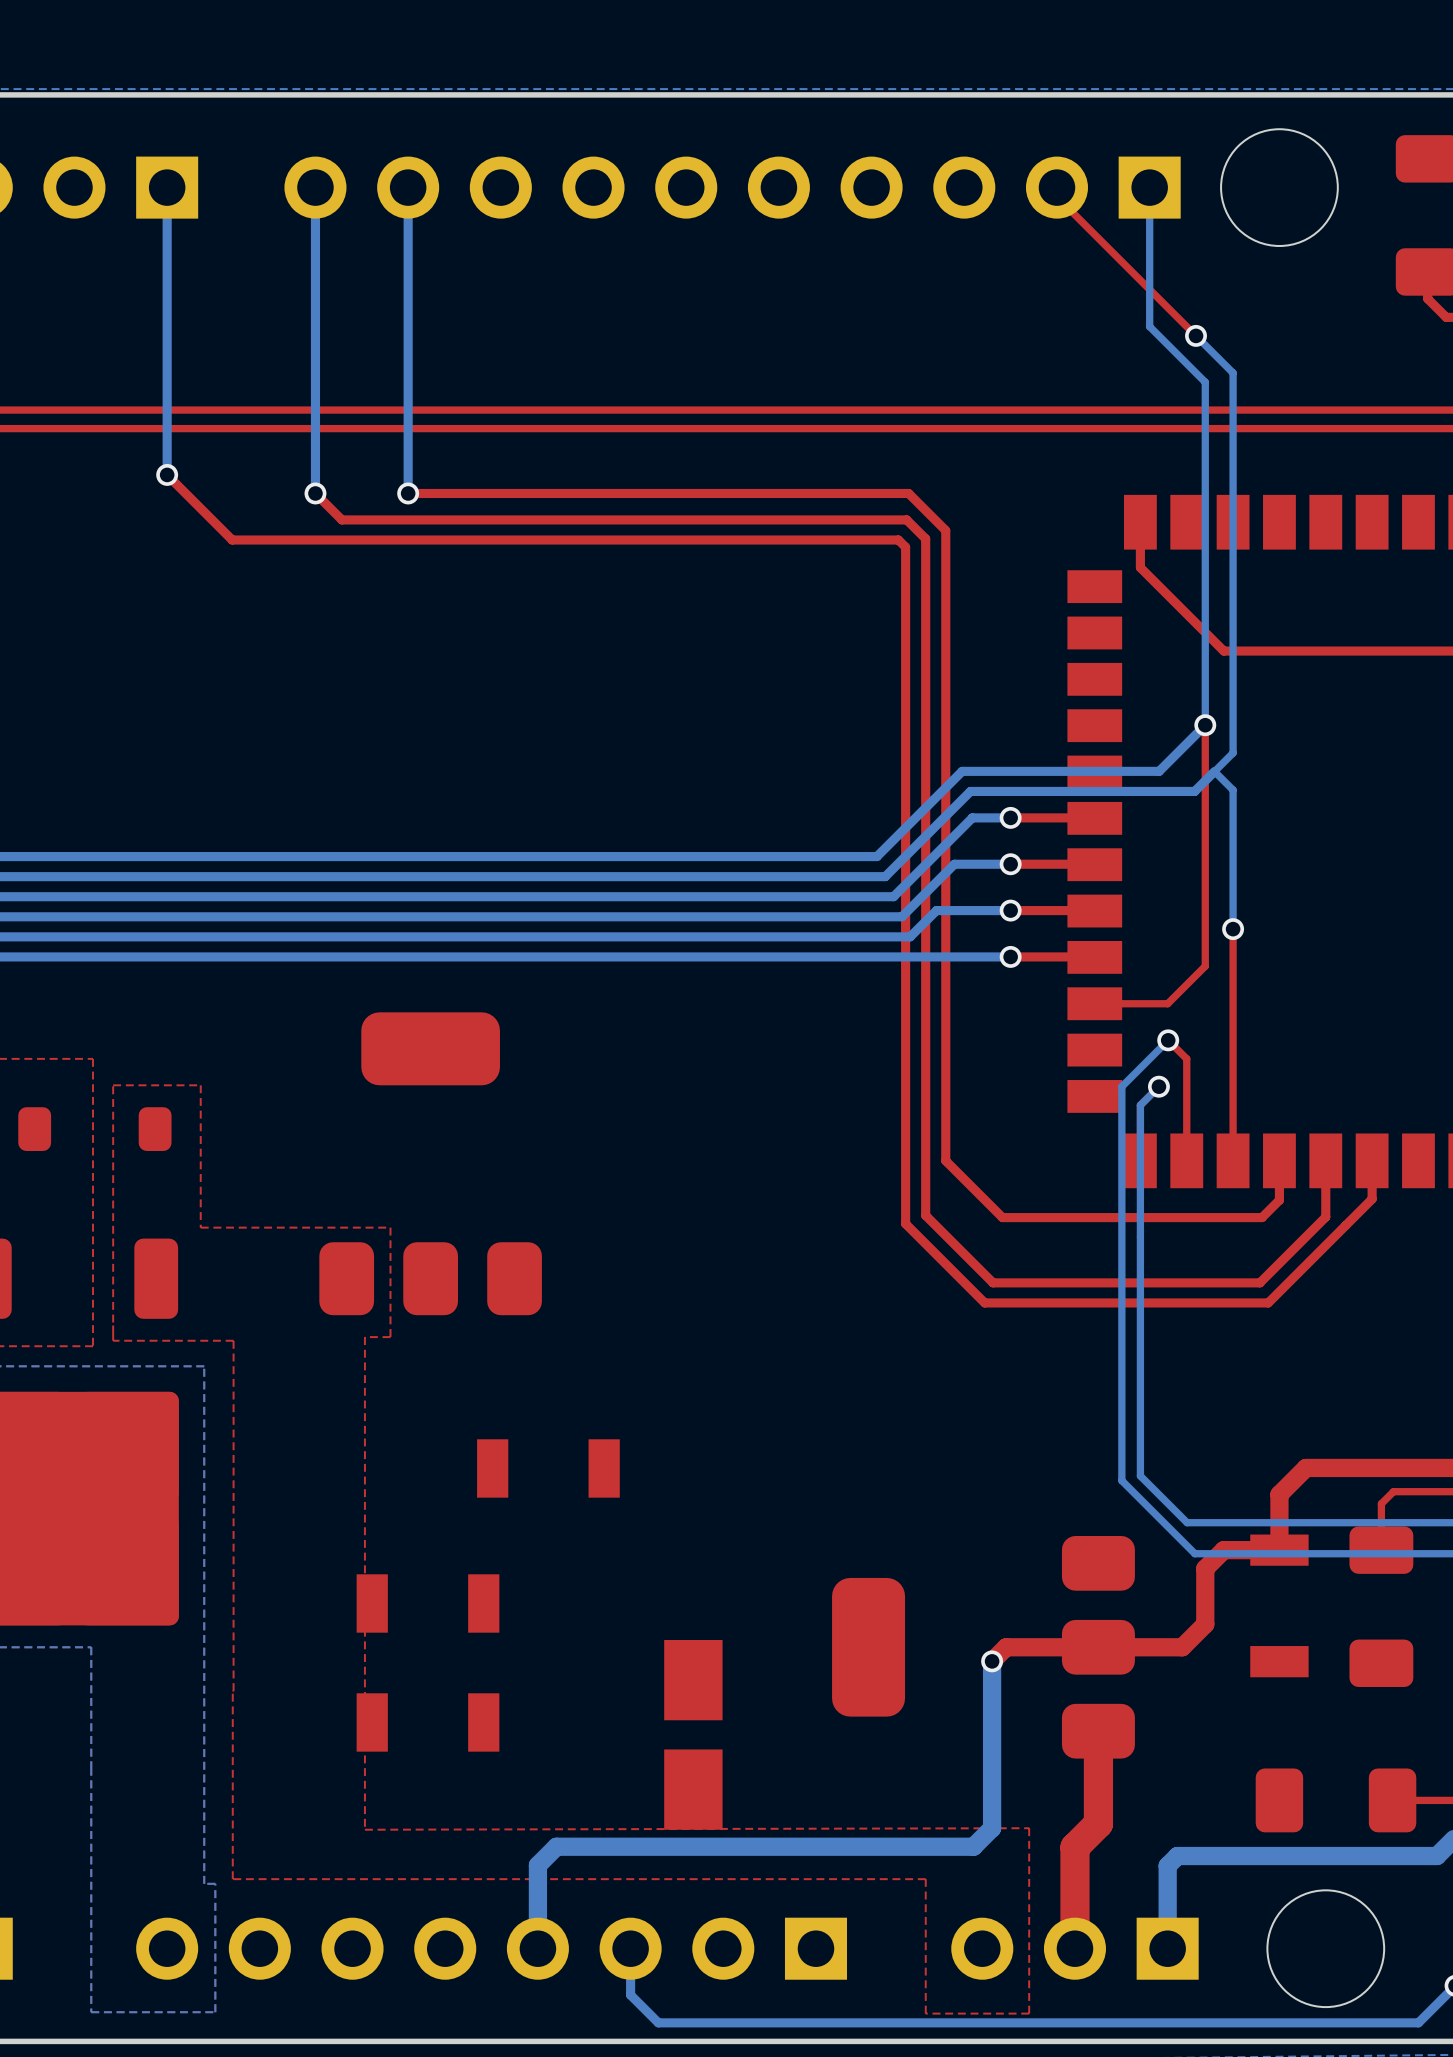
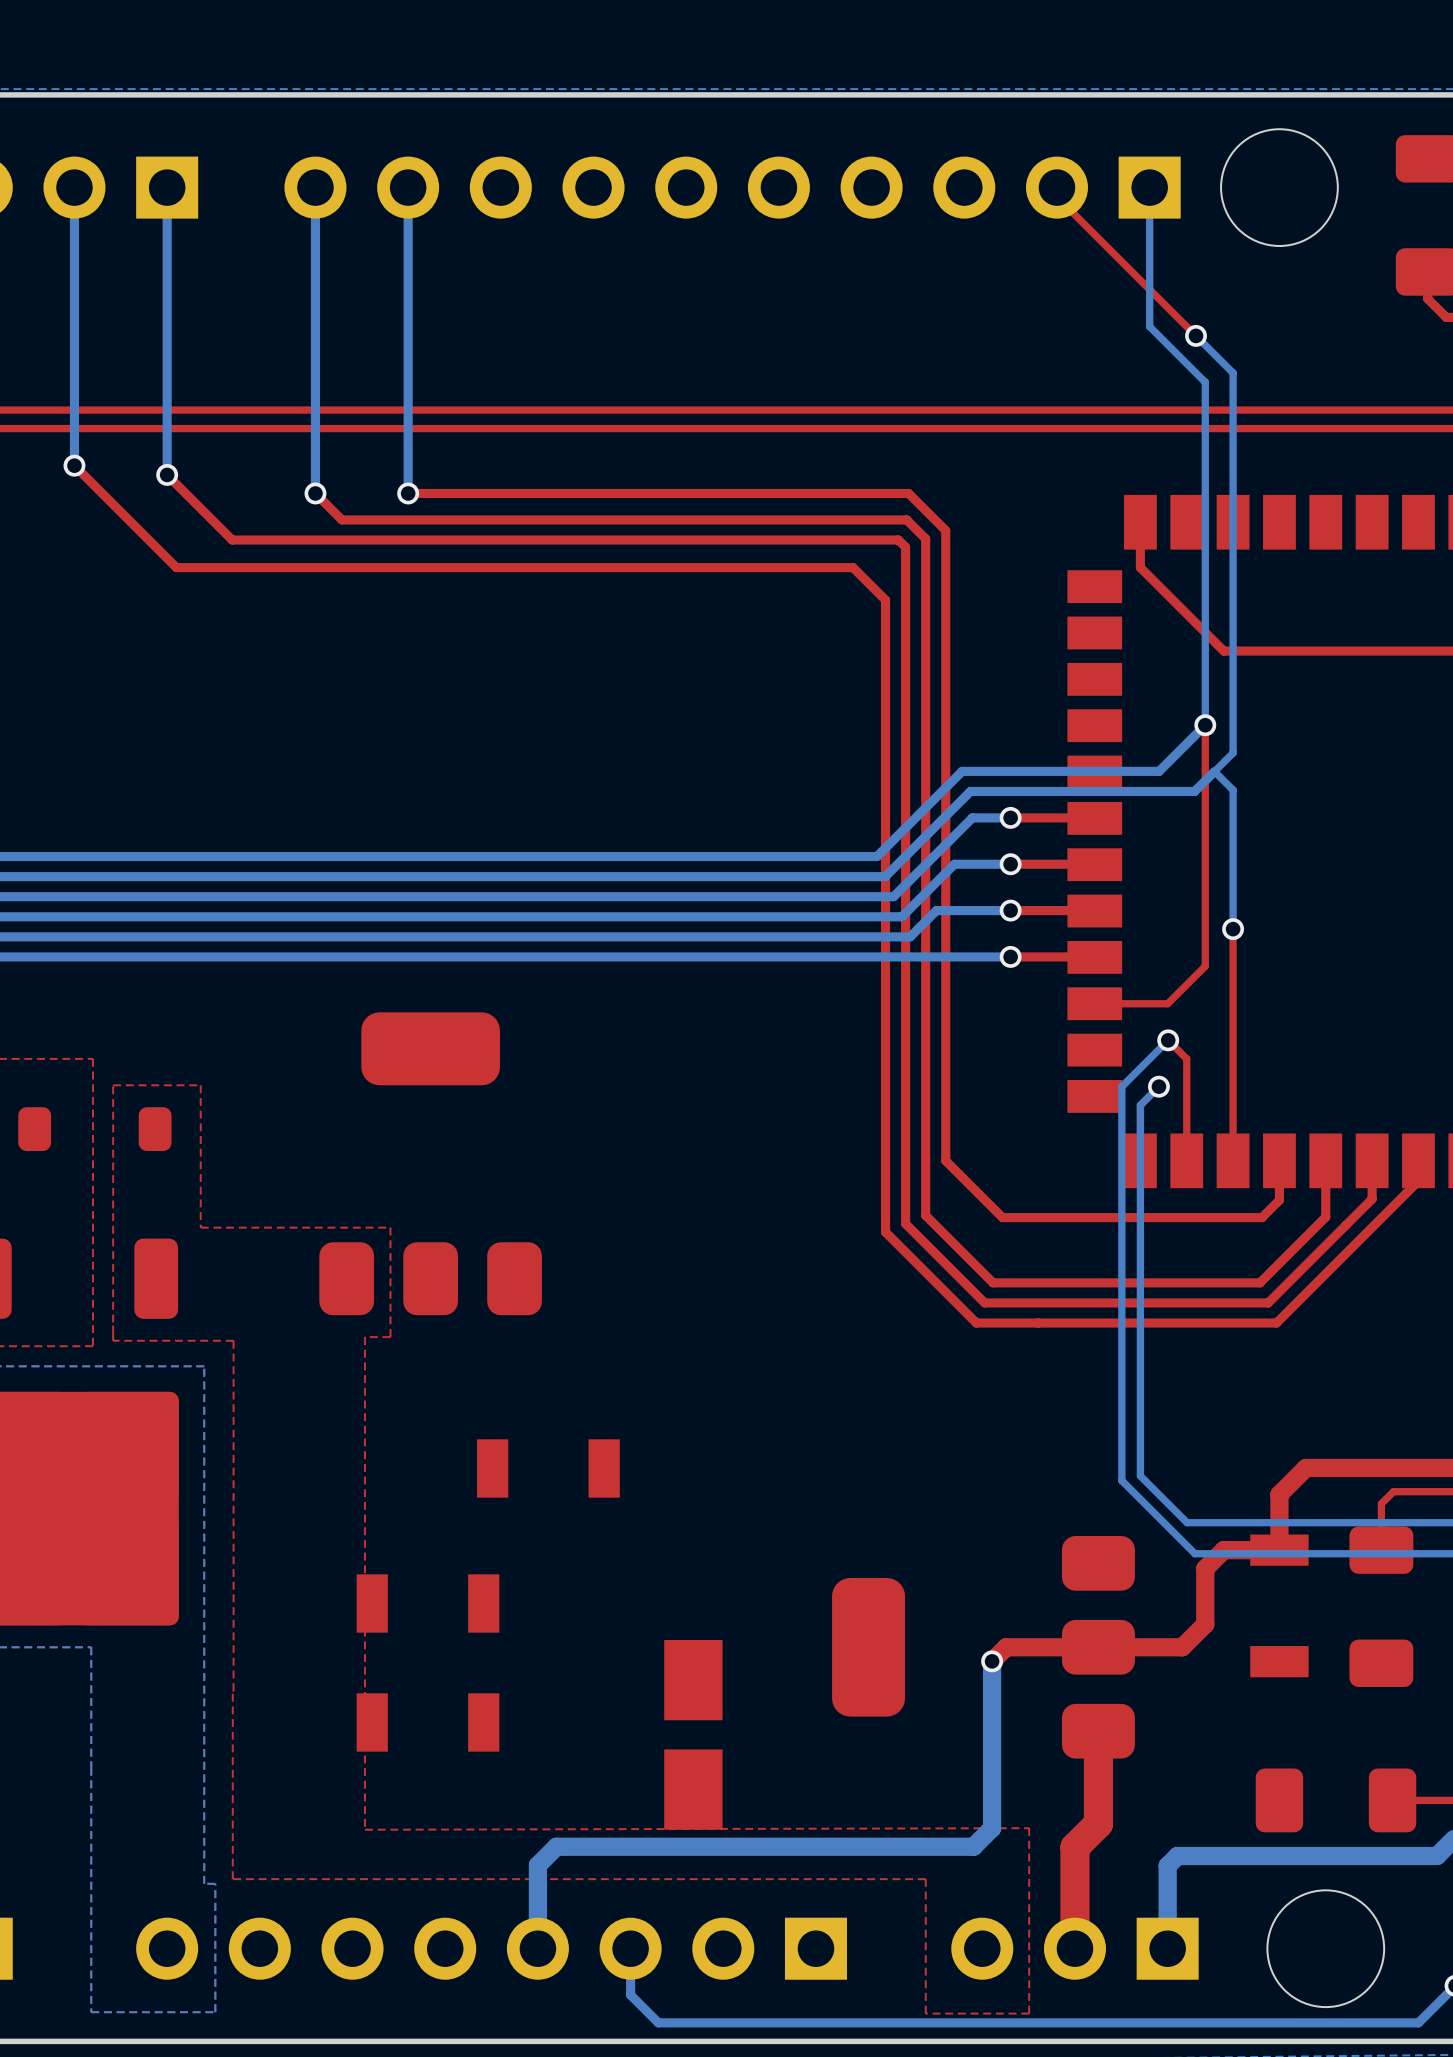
bottom track: none -> (74, 187) (74, 465)
top track: none -> (74, 465) (176, 567) (853, 567) (885, 600) (885, 1232) (976, 1323) (1276, 1323) (1418, 1181) (1418, 1160)
via: none -> (74, 465)

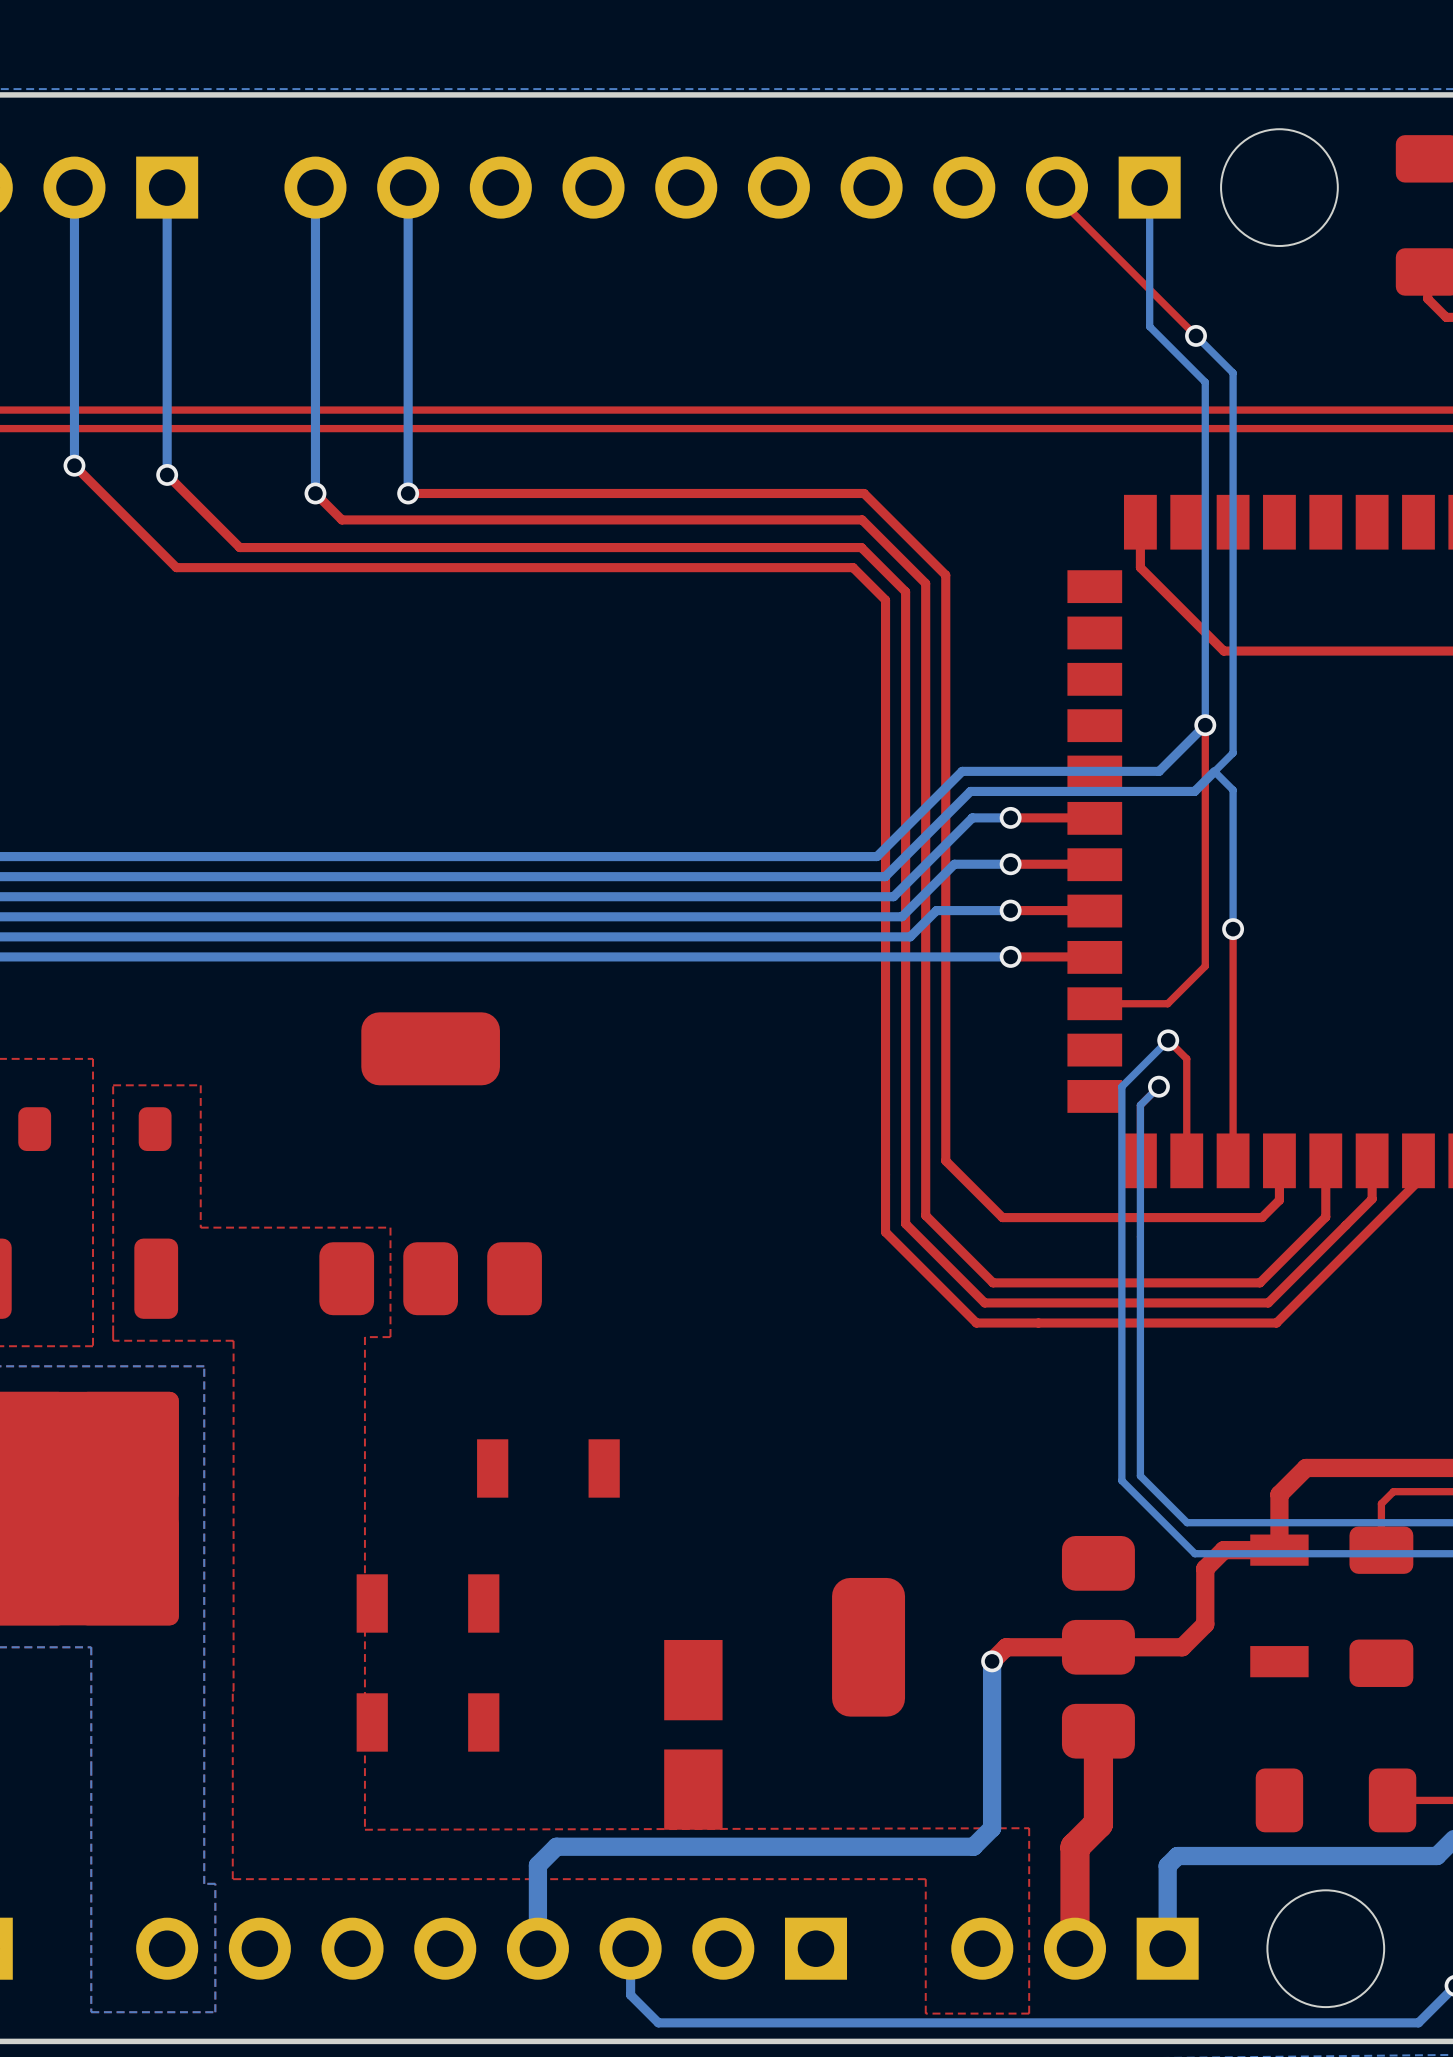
top track: (864, 493) (908, 493) (945, 530) (945, 575) -> (864, 493) (945, 575)
top track: (862, 519) (906, 519) (925, 538) (925, 583) -> (862, 519) (925, 583)
top track: (232, 540) (898, 540) (905, 547) (905, 591) -> (232, 540) (239, 547) (861, 547) (905, 591)

